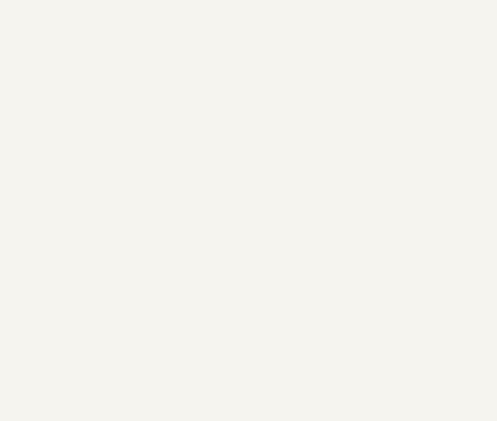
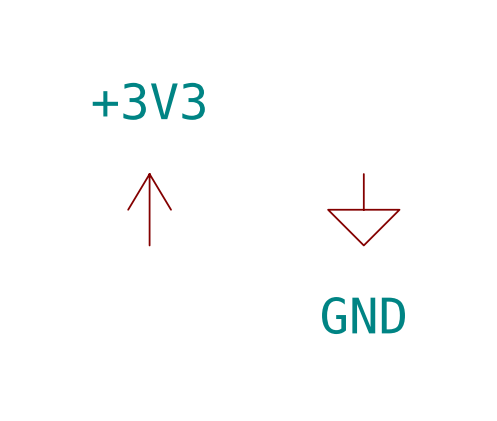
power symbol: none -> +3V3 (149, 209)
power symbol: none -> GND (363, 209)

